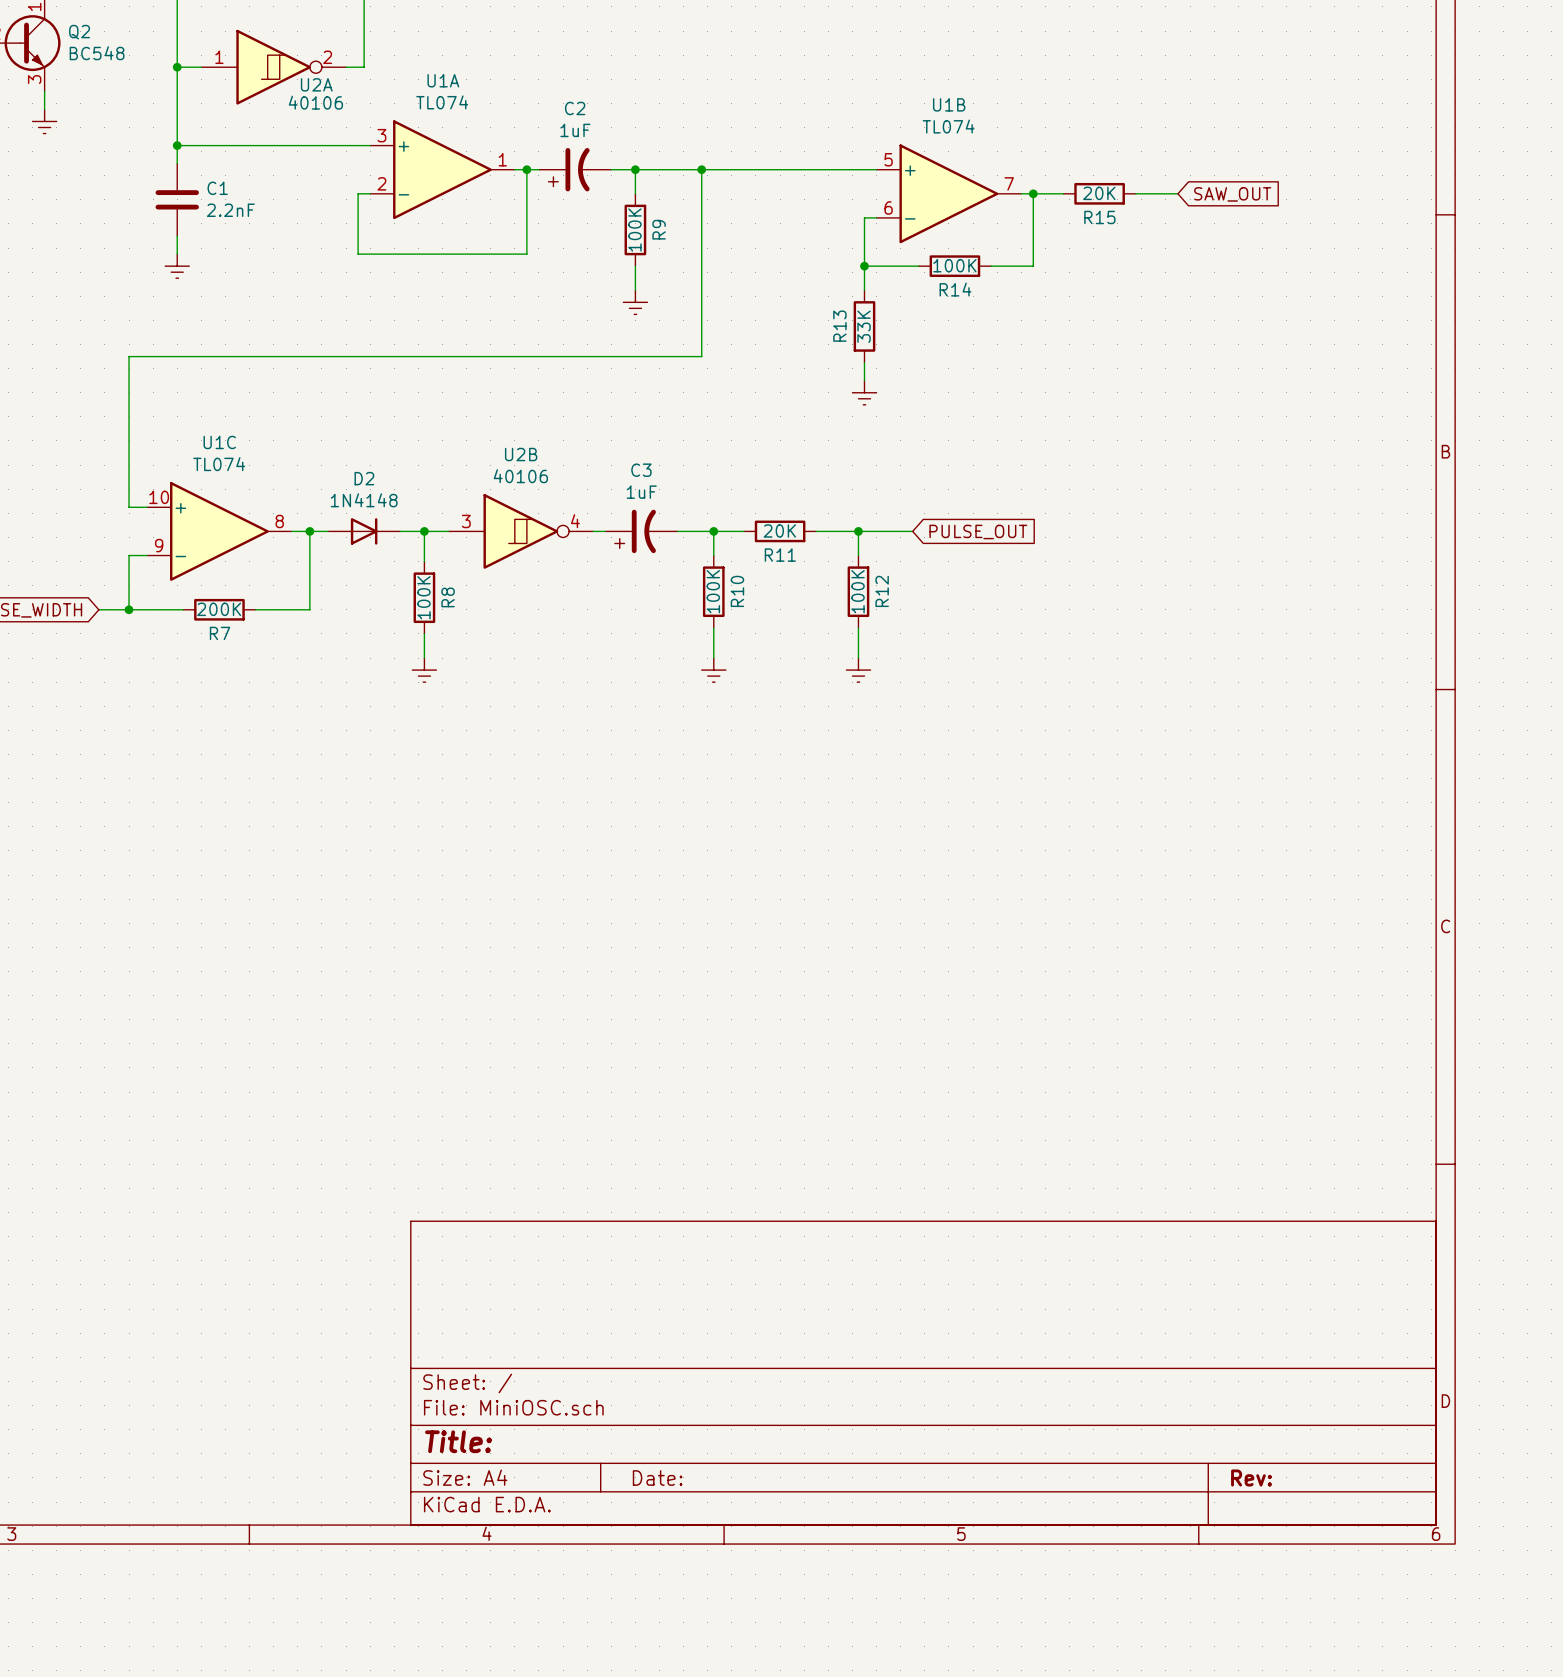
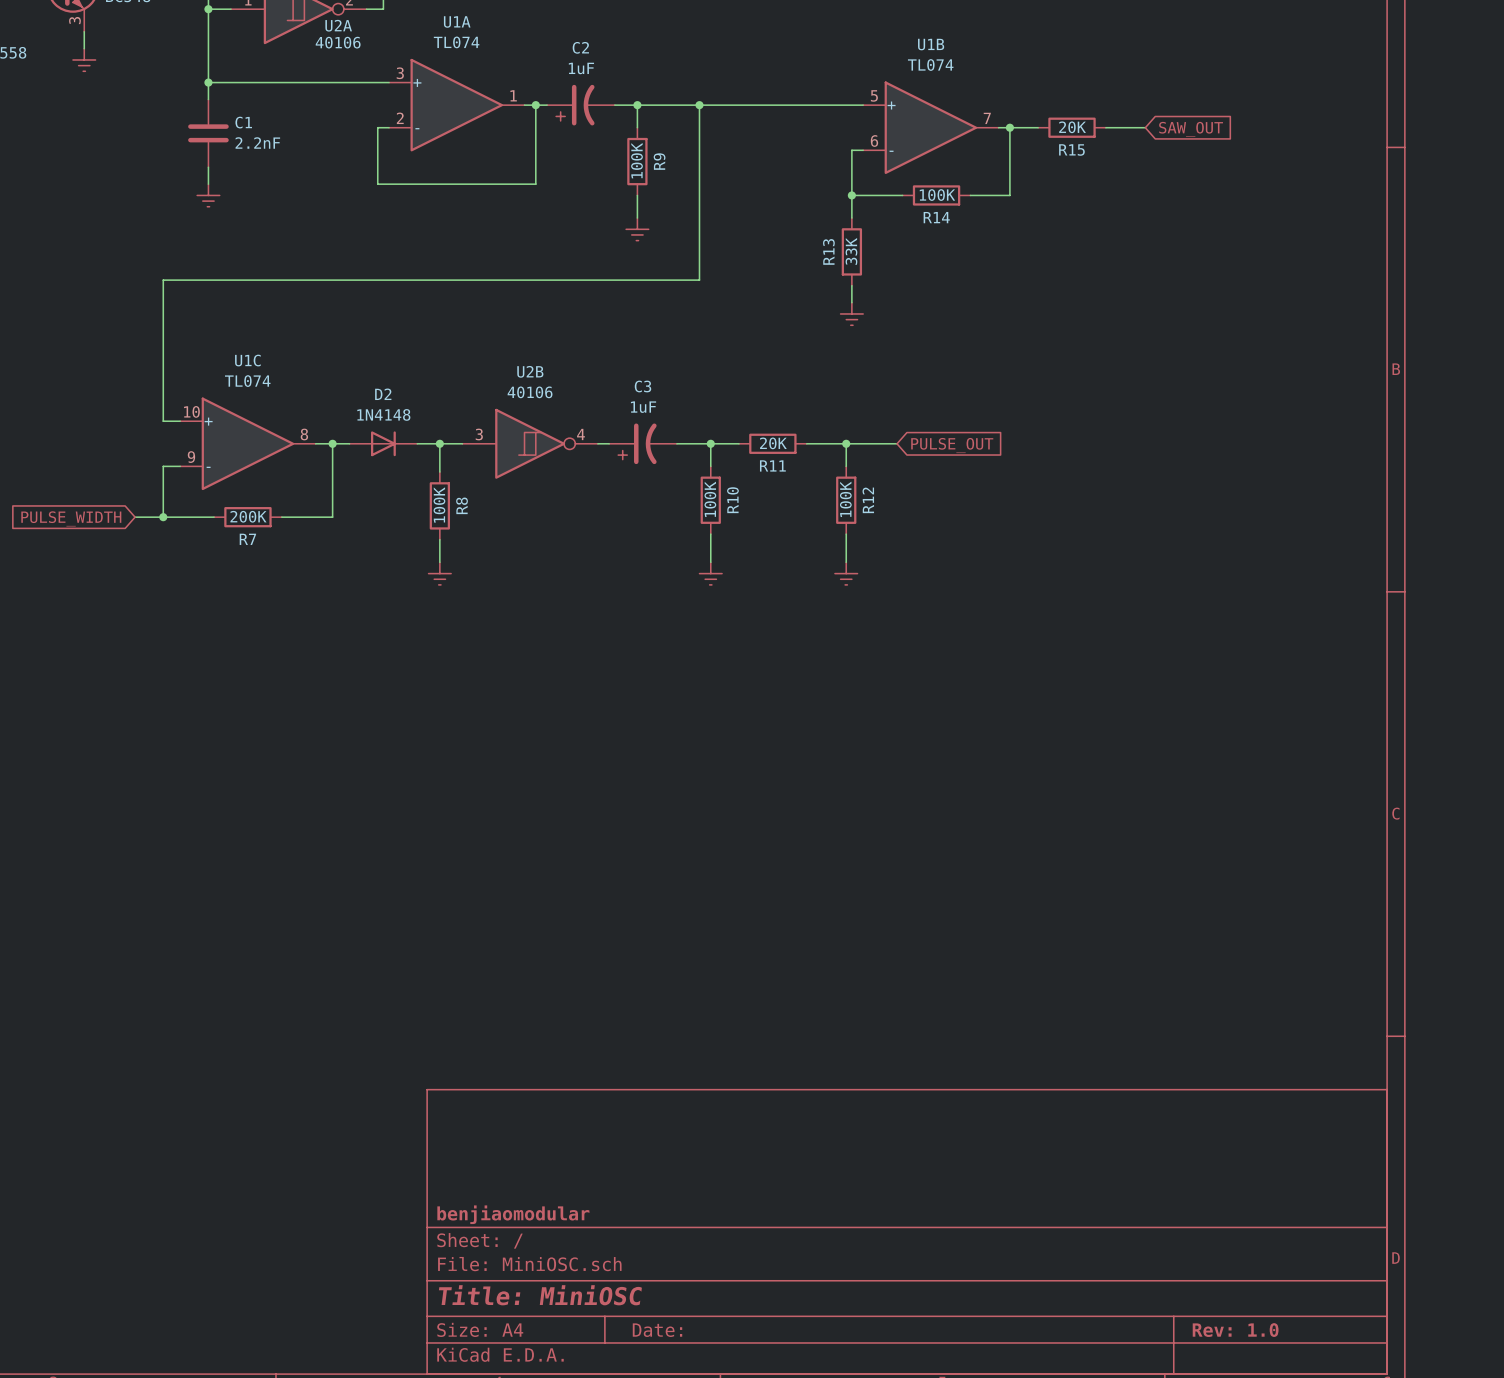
title block: none -> benjiaomodular (513, 1214)
title block: Title: (458, 1441) -> Title: MiniOSC (540, 1295)
title block: Rev: (1251, 1478) -> Rev: 1.0 (1235, 1330)

